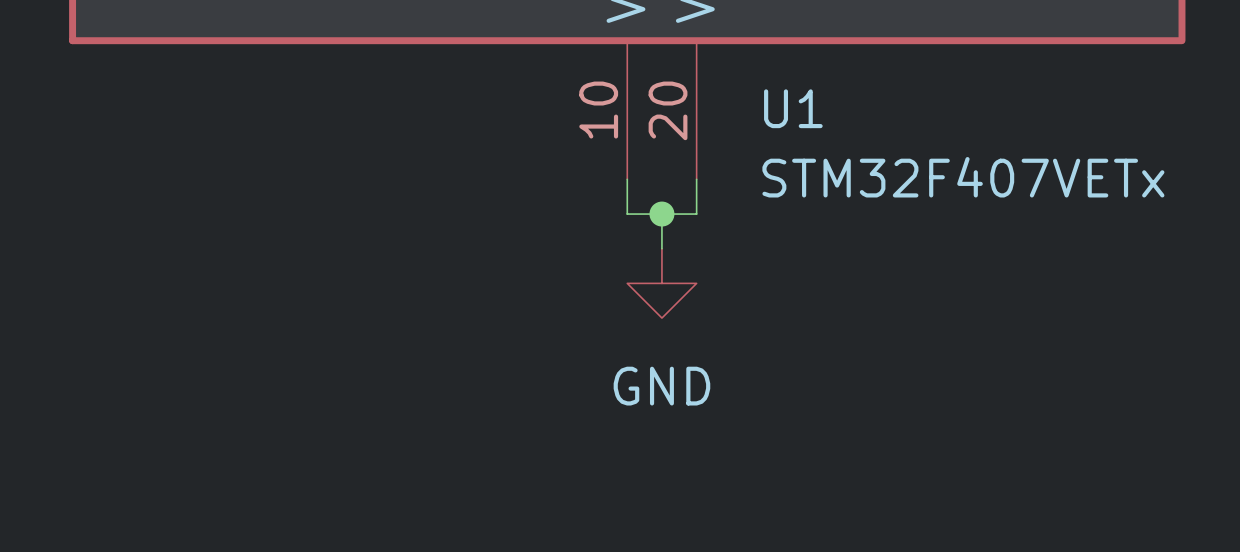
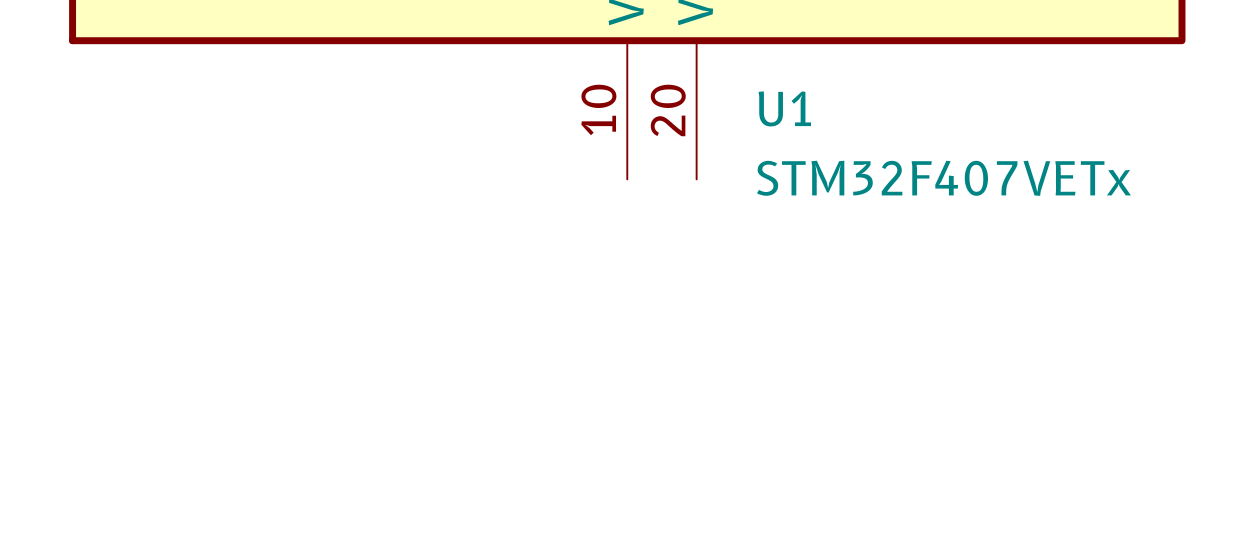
wire: (627, 179) (627, 214) (696, 214) (696, 179) -> none
wire: (661, 214) (661, 248) -> none
junction: (661, 214) -> none
power symbol: GND (661, 283) -> none

